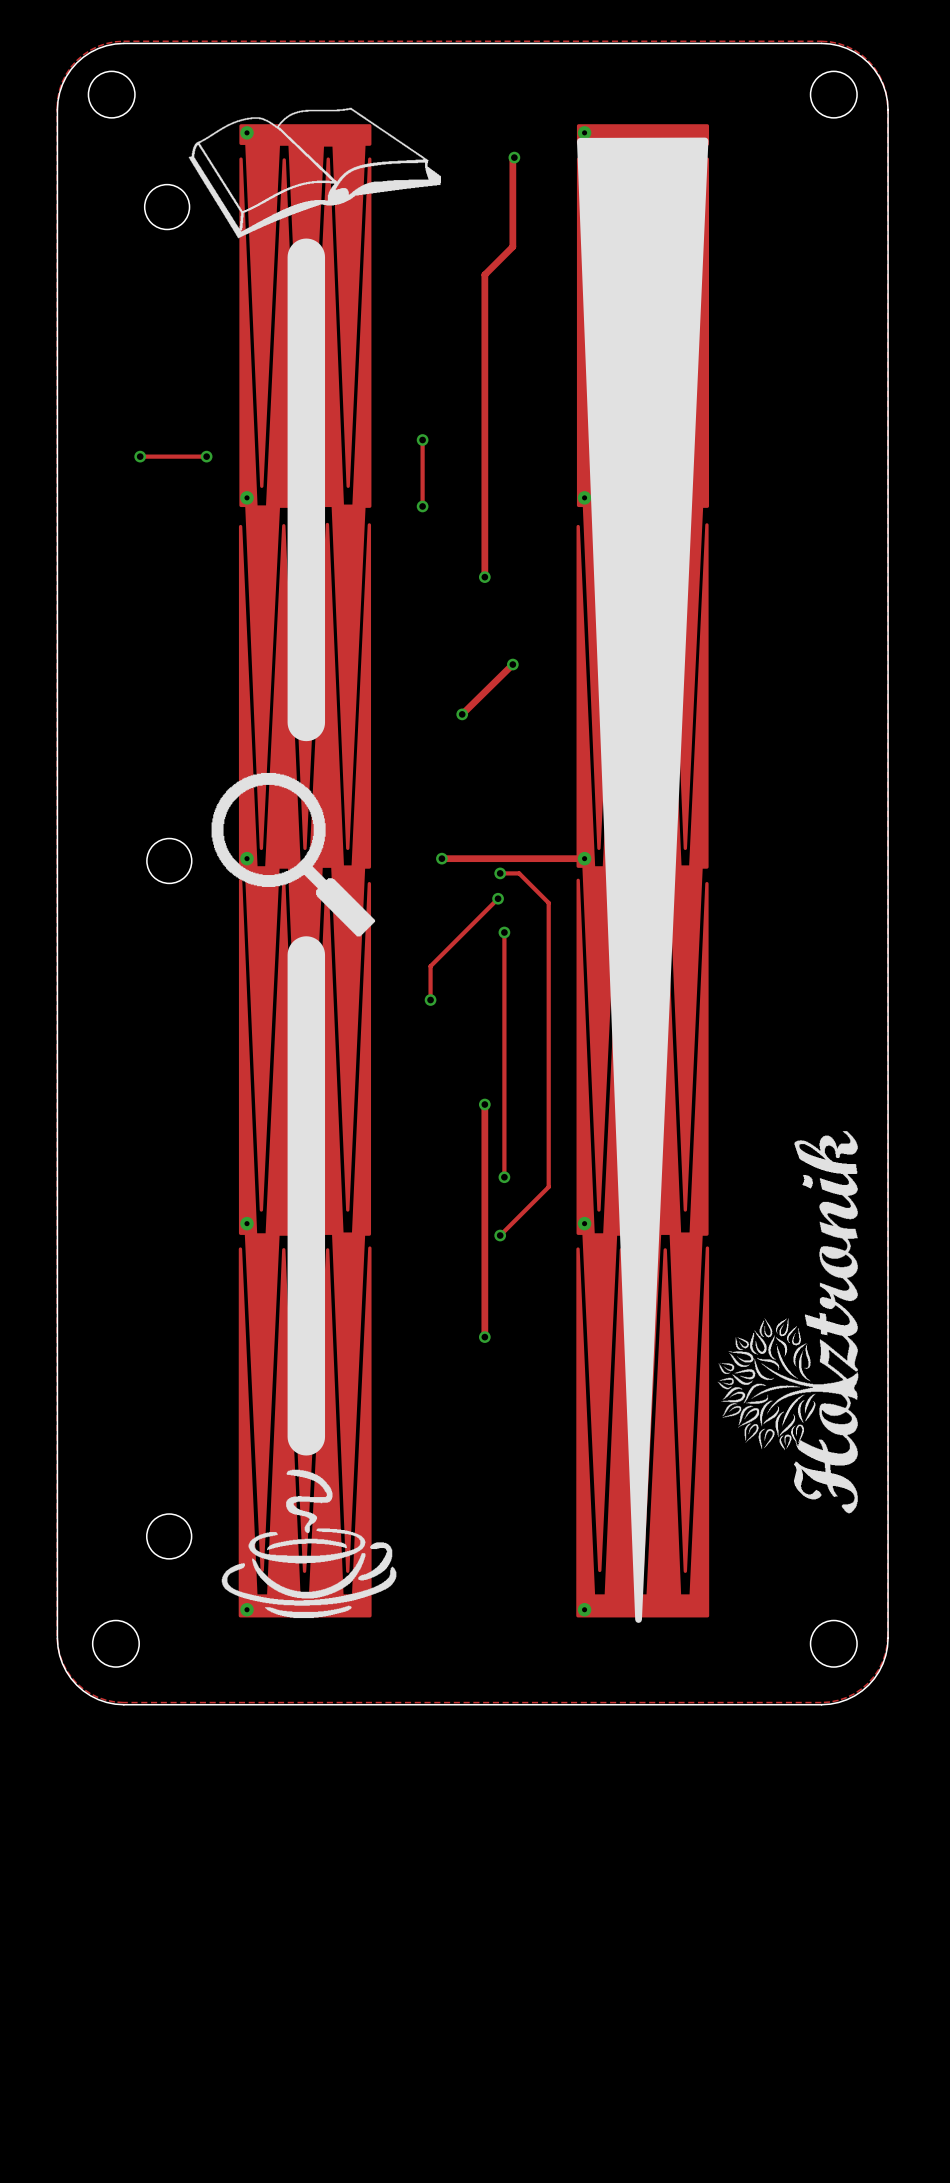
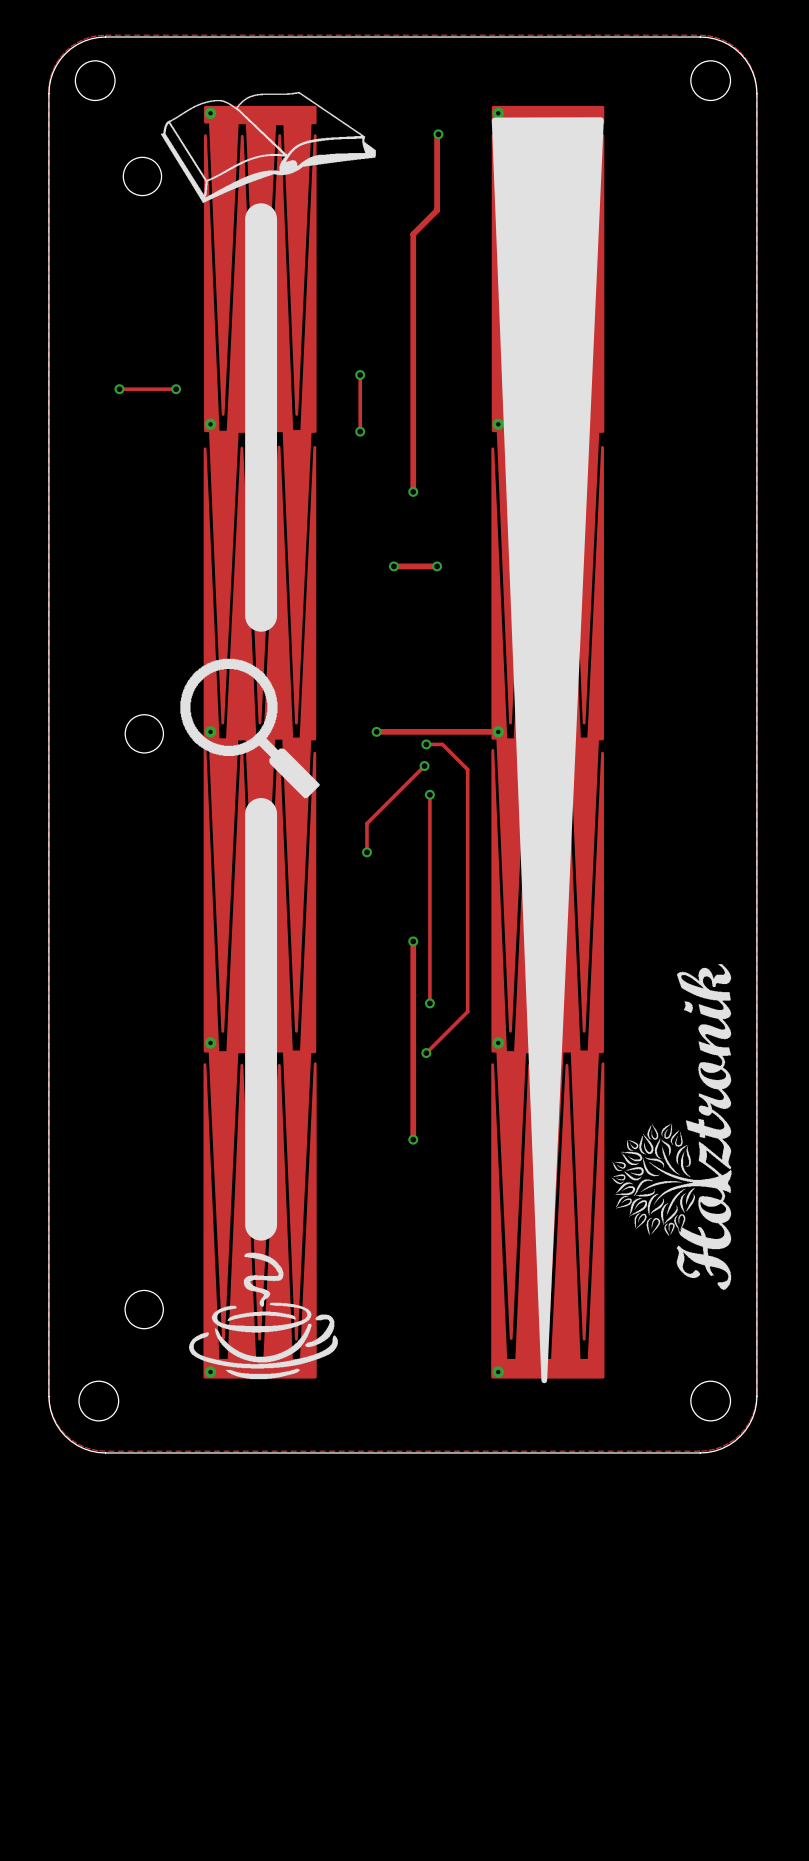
track: (512, 664) (462, 714) -> (437, 566) (393, 566)
via position: (462, 714) -> (393, 566)

